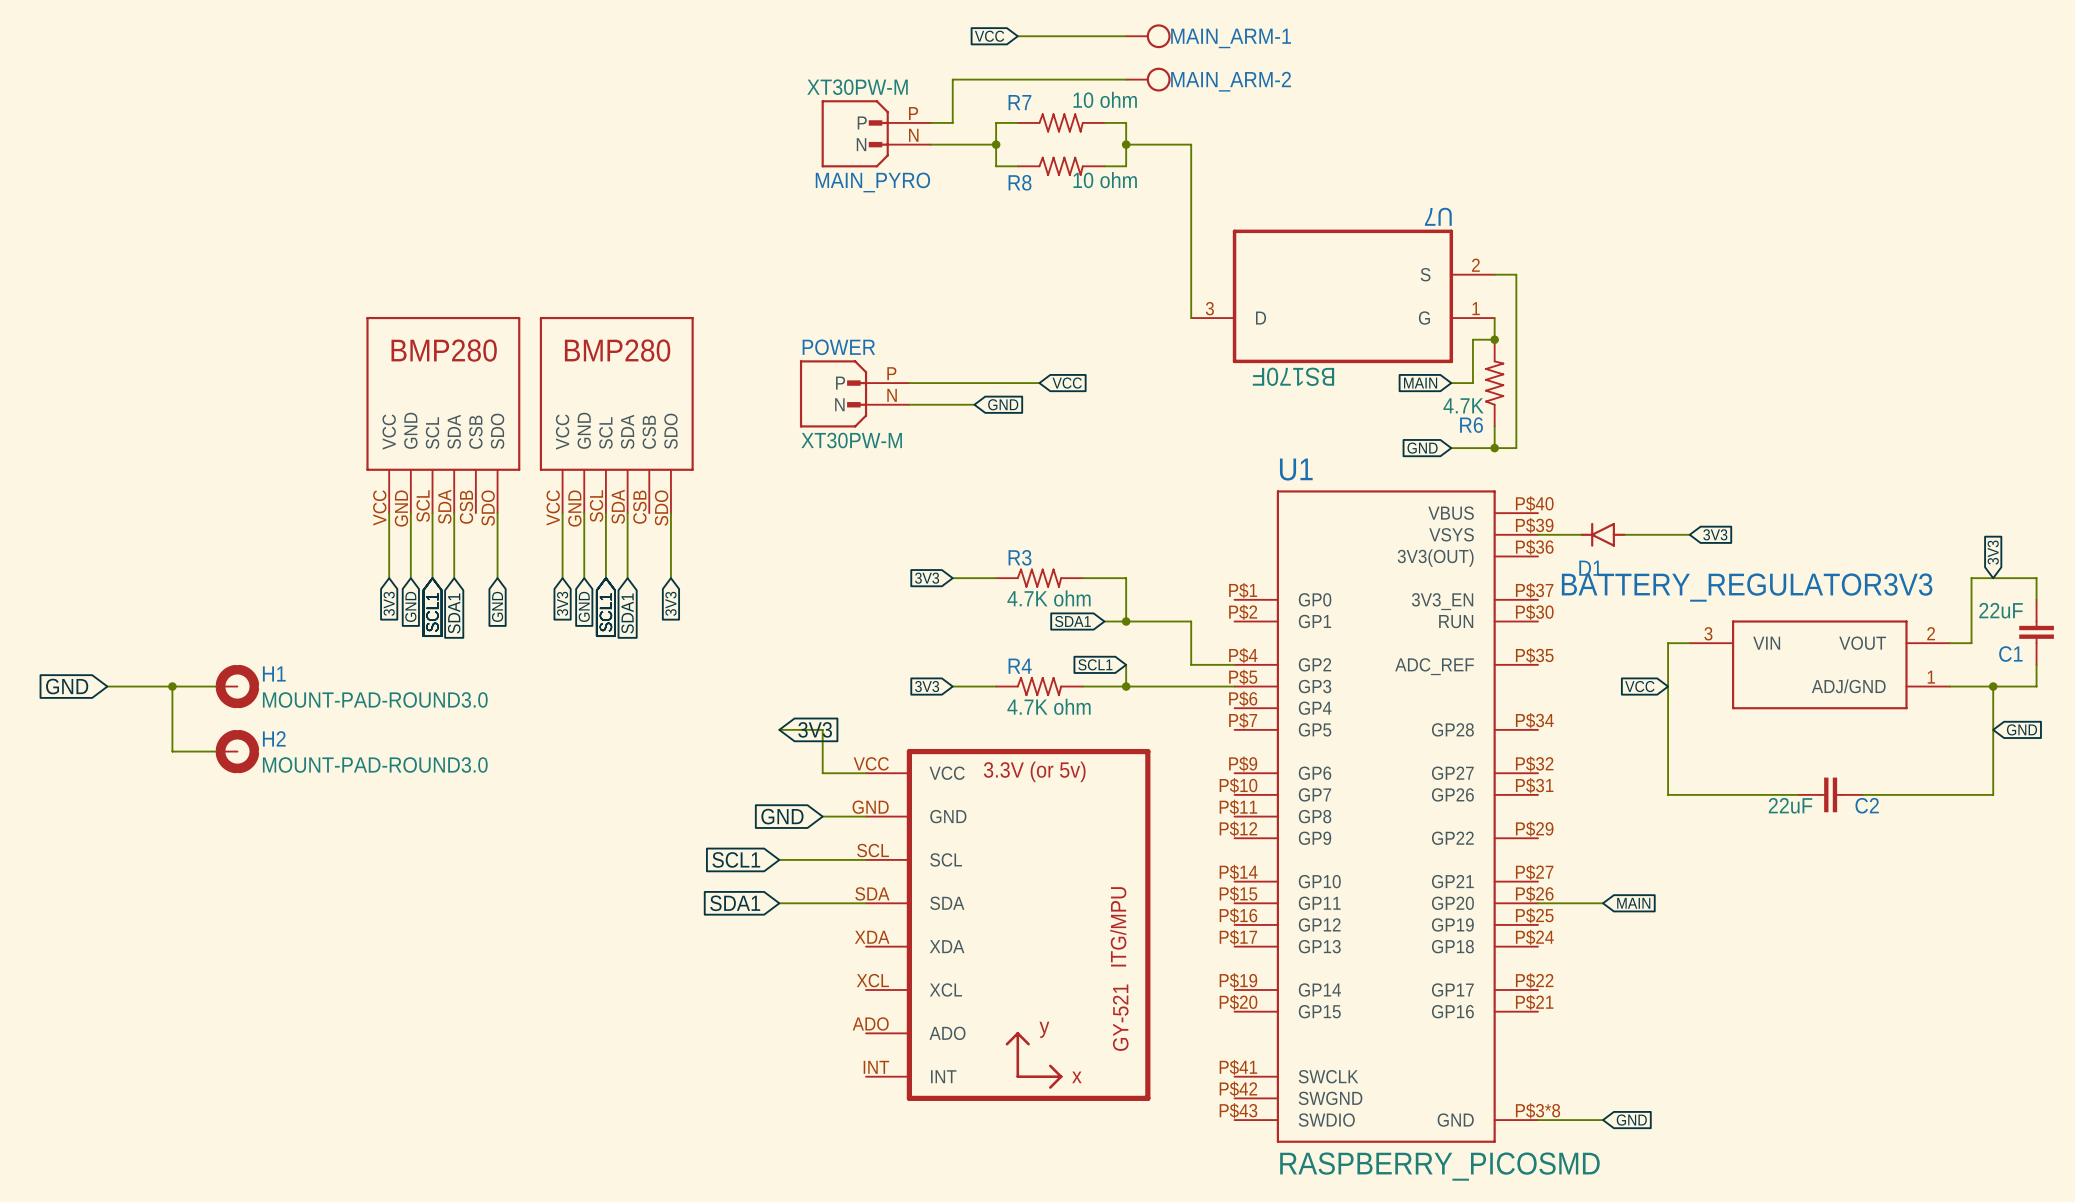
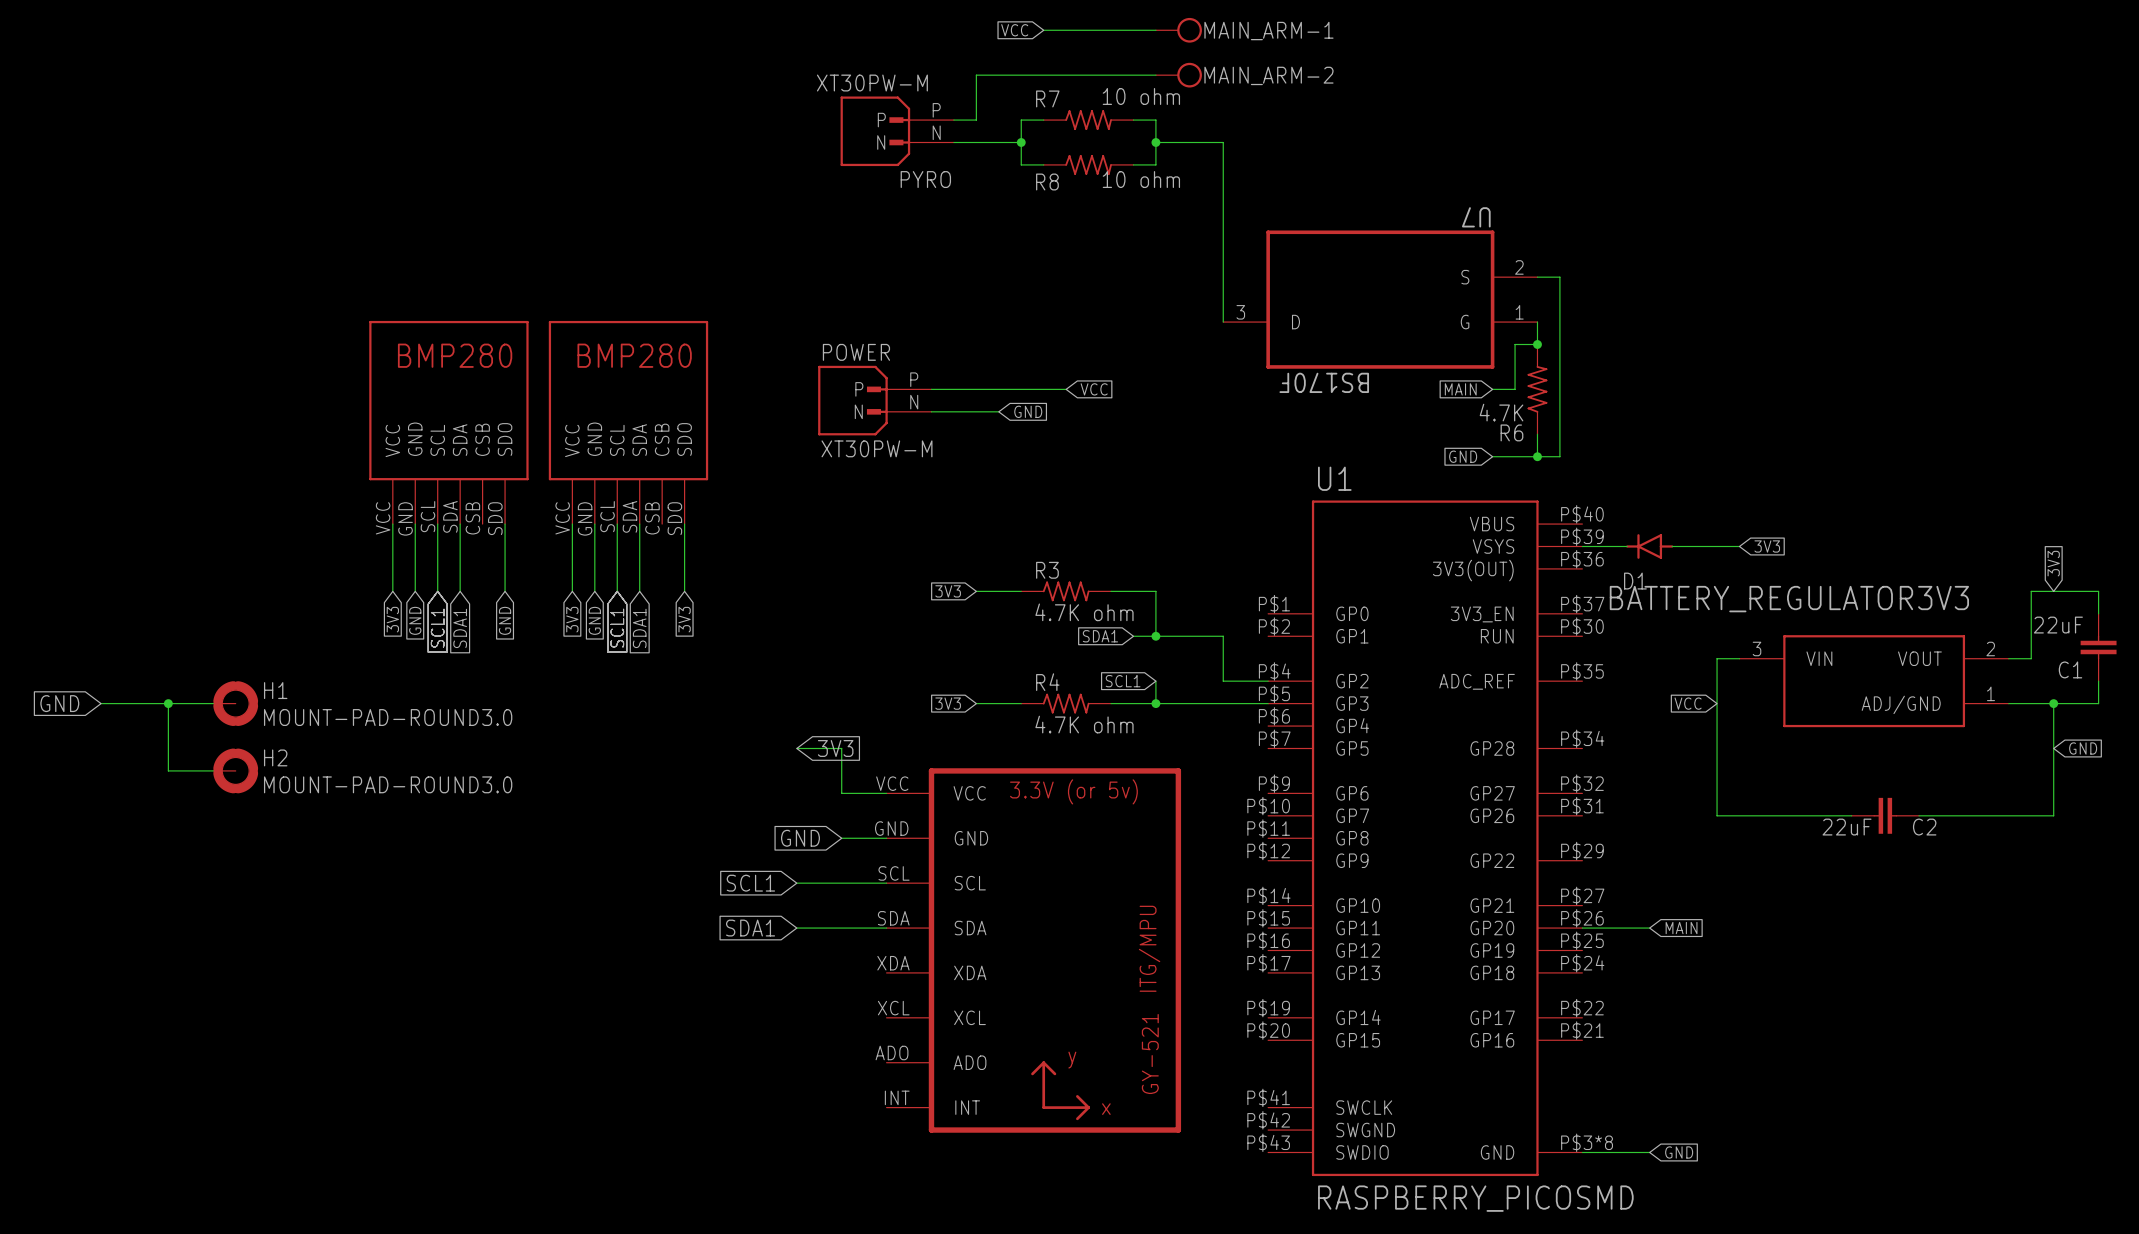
MAIN_PYRO name: MAIN_PYRO (872, 182) -> PYRO (925, 179)

